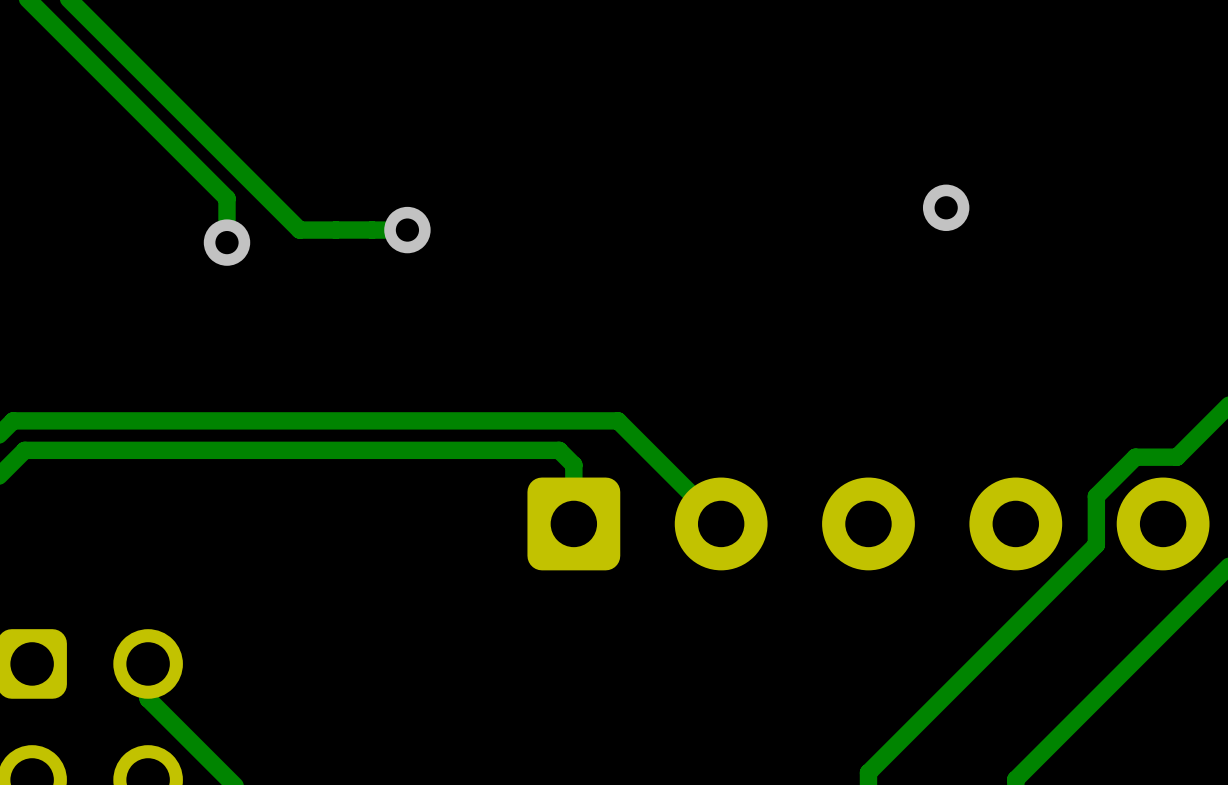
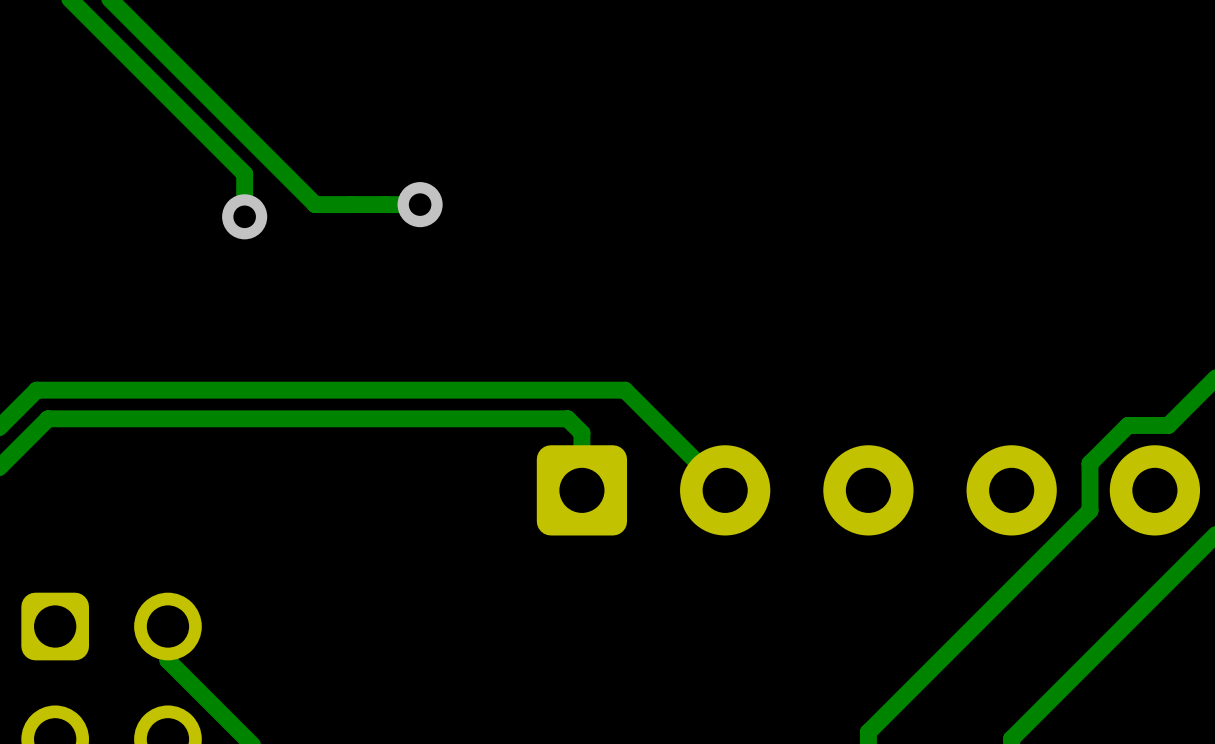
via: (946, 207) -> none

